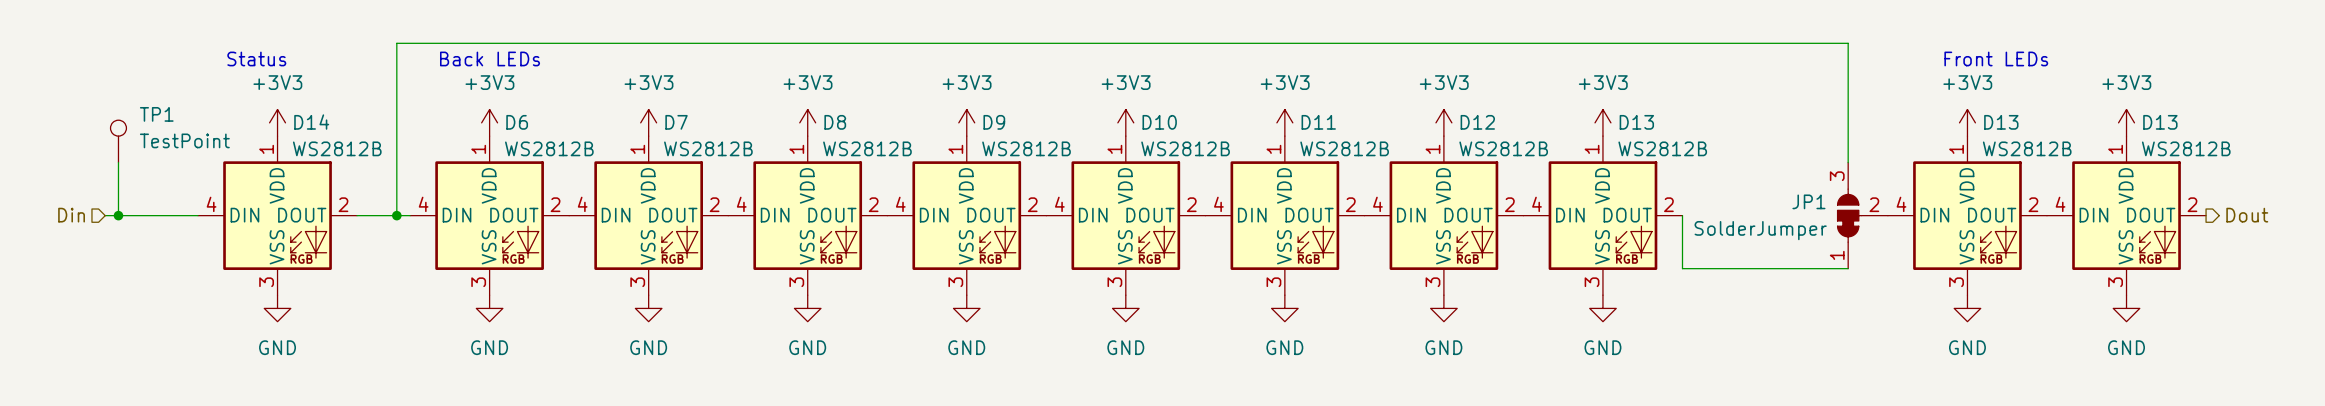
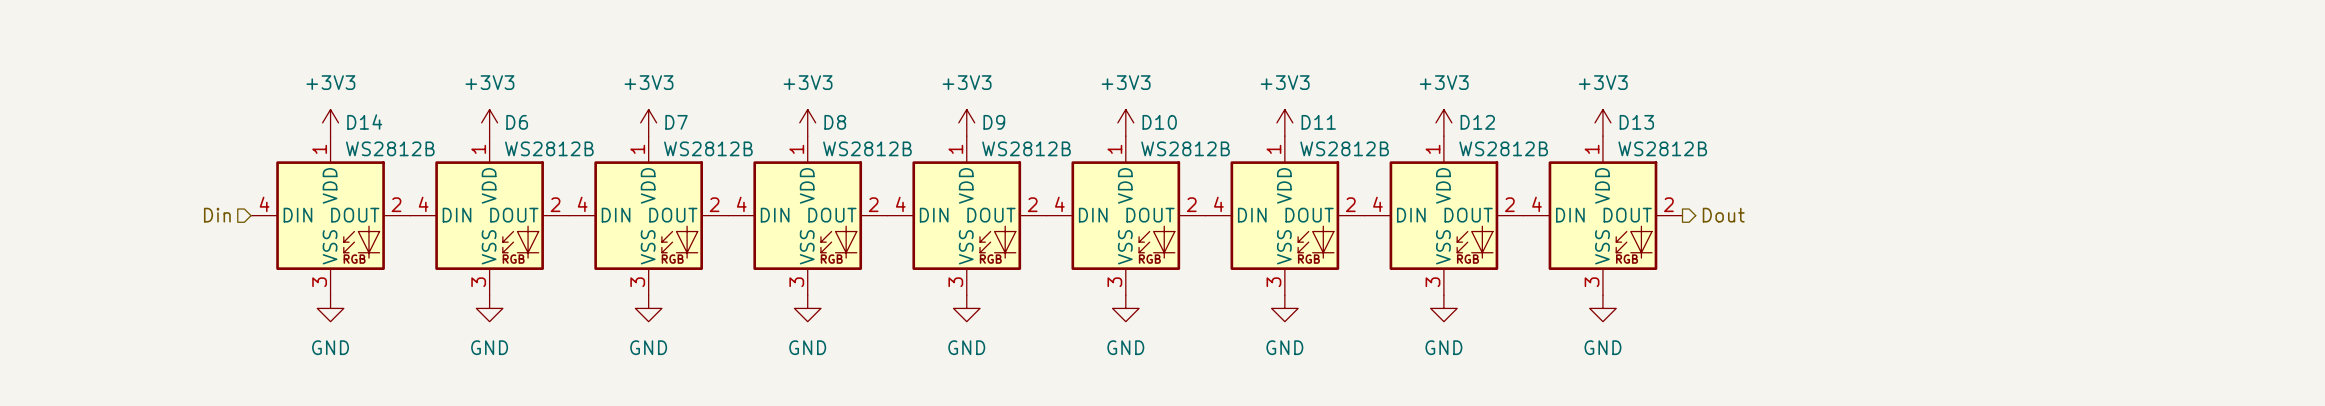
text: Status (256, 58) -> none
text: Back LEDs (490, 58) -> none
text: Front LEDs (1996, 58) -> none
power symbol position: +3V3 (277, 122) -> +3V3 (330, 122)
power symbol: +3V3 (1967, 122) -> none
power symbol: +3V3 (2126, 122) -> none
TP1: TestPoint (118, 141) -> none
wire: (118, 162) (118, 215) -> none
wire: (1848, 162) (1848, 43) (396, 43) (396, 215) -> none
hierarchical label position: Din (71, 215) -> Din (217, 215)
wire: (105, 215) (198, 215) -> none
junction: (118, 215) -> none
D14 position: (277, 215) -> (330, 215)
junction: (396, 215) -> none
wire: (1682, 215) (1682, 268) (1848, 268) -> none
hierarchical label: none -> Dout (1723, 215)
JP1: SolderJumper (1862, 215) -> none
D13: WS2812B (1967, 215) -> none
D13: WS2812B (2126, 215) -> none
hierarchical label: Dout (2247, 215) -> none
power symbol position: GND (277, 308) -> GND (330, 308)
power symbol: GND (1967, 308) -> none
power symbol: GND (2126, 308) -> none

